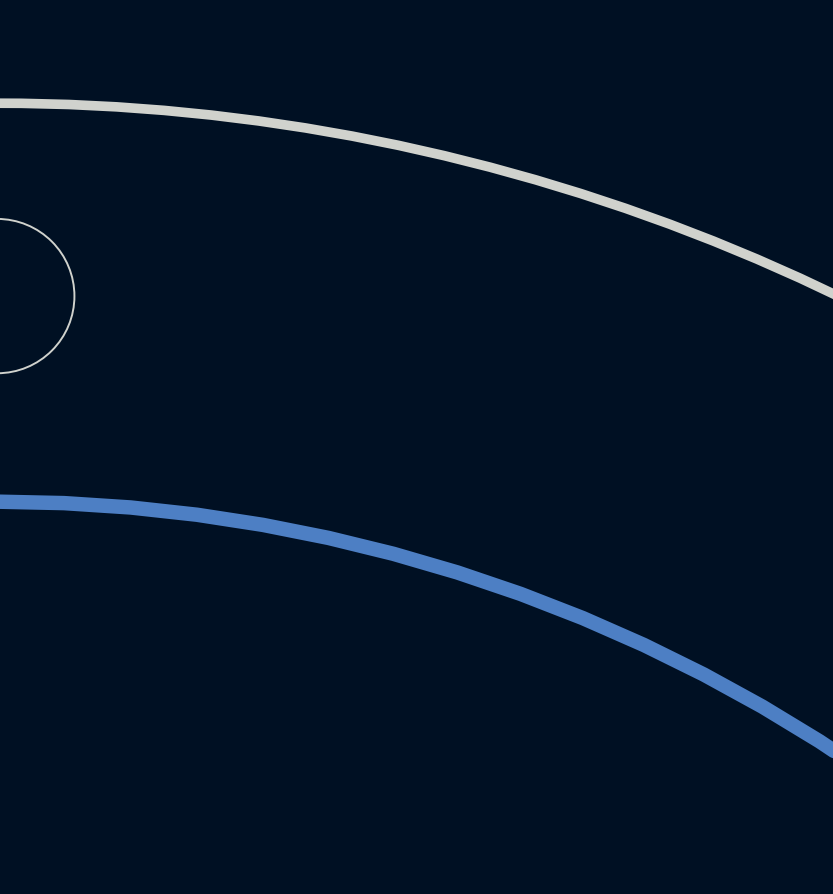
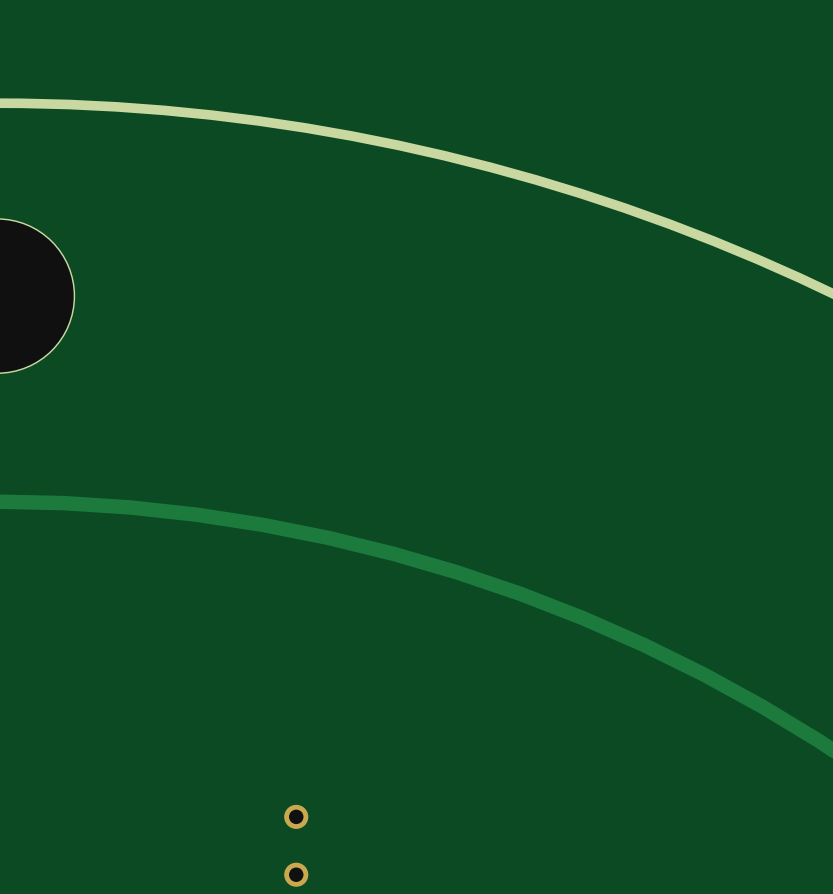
via: none -> (296, 816)
via: none -> (296, 874)

